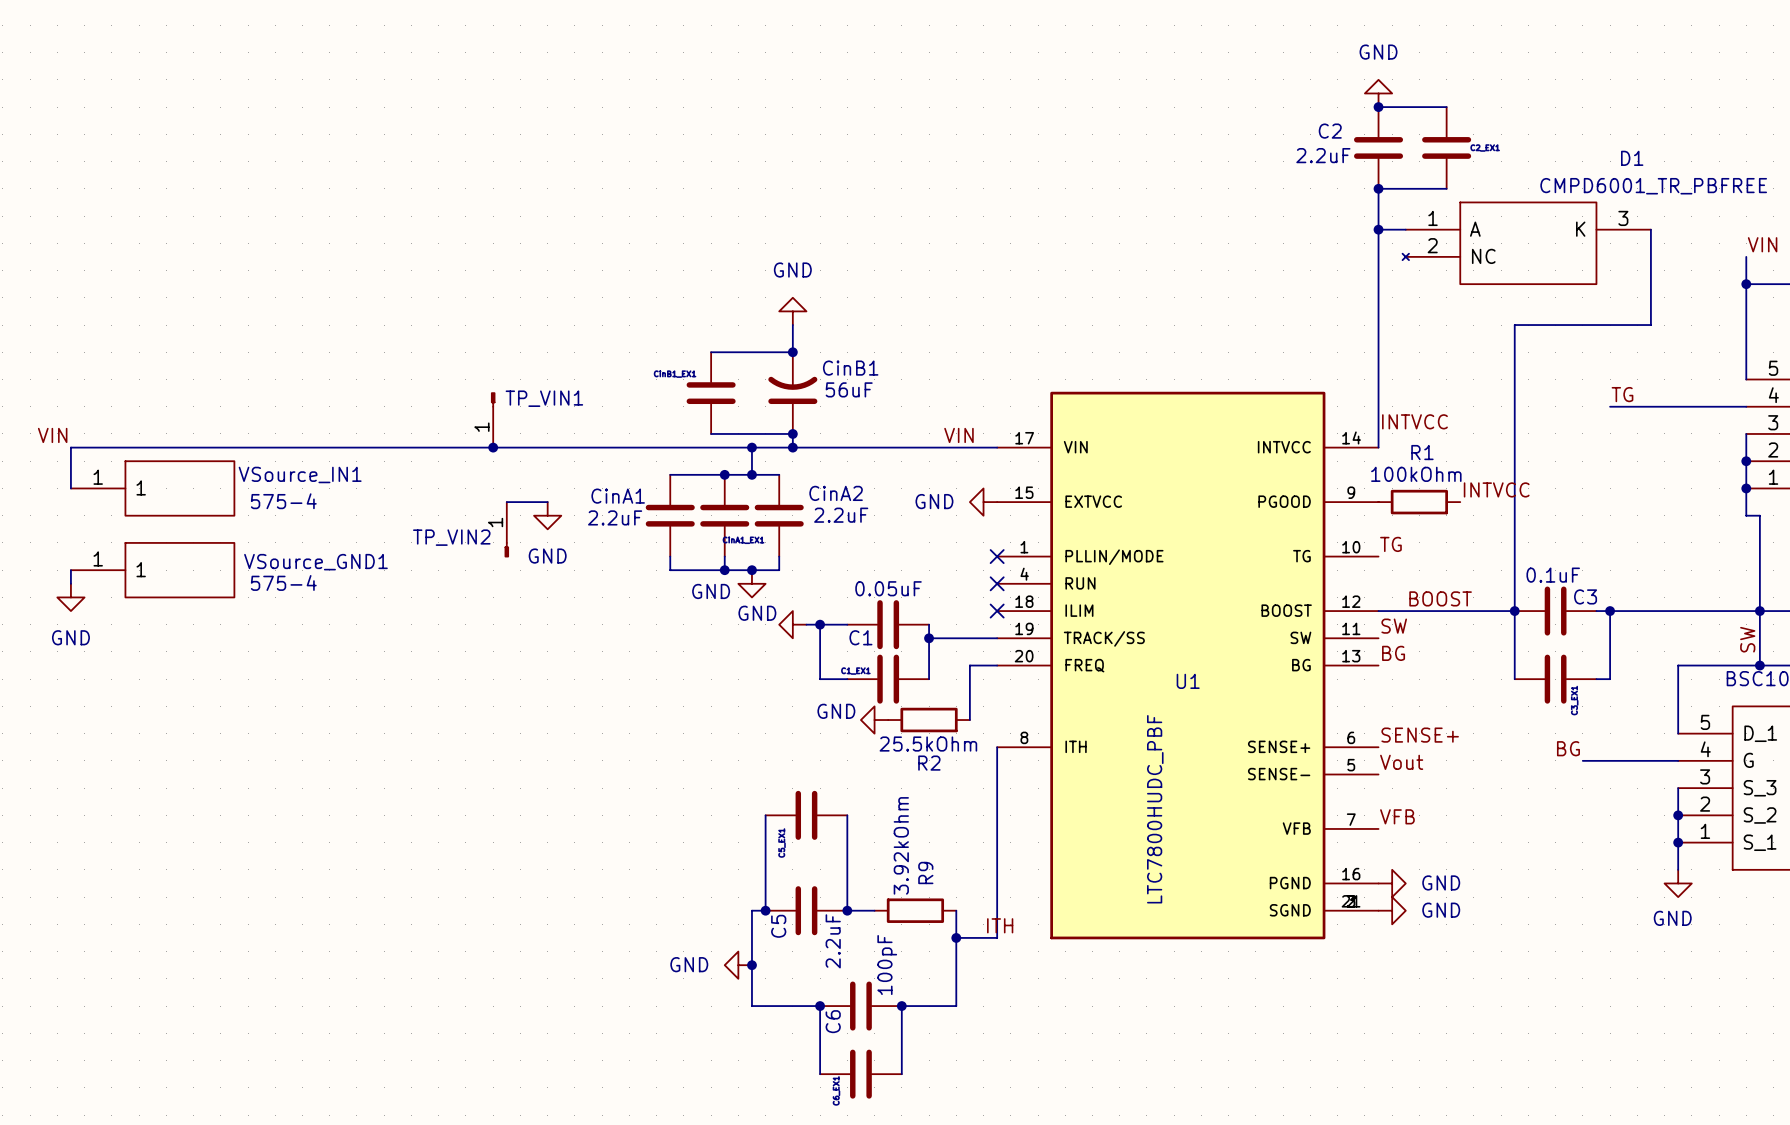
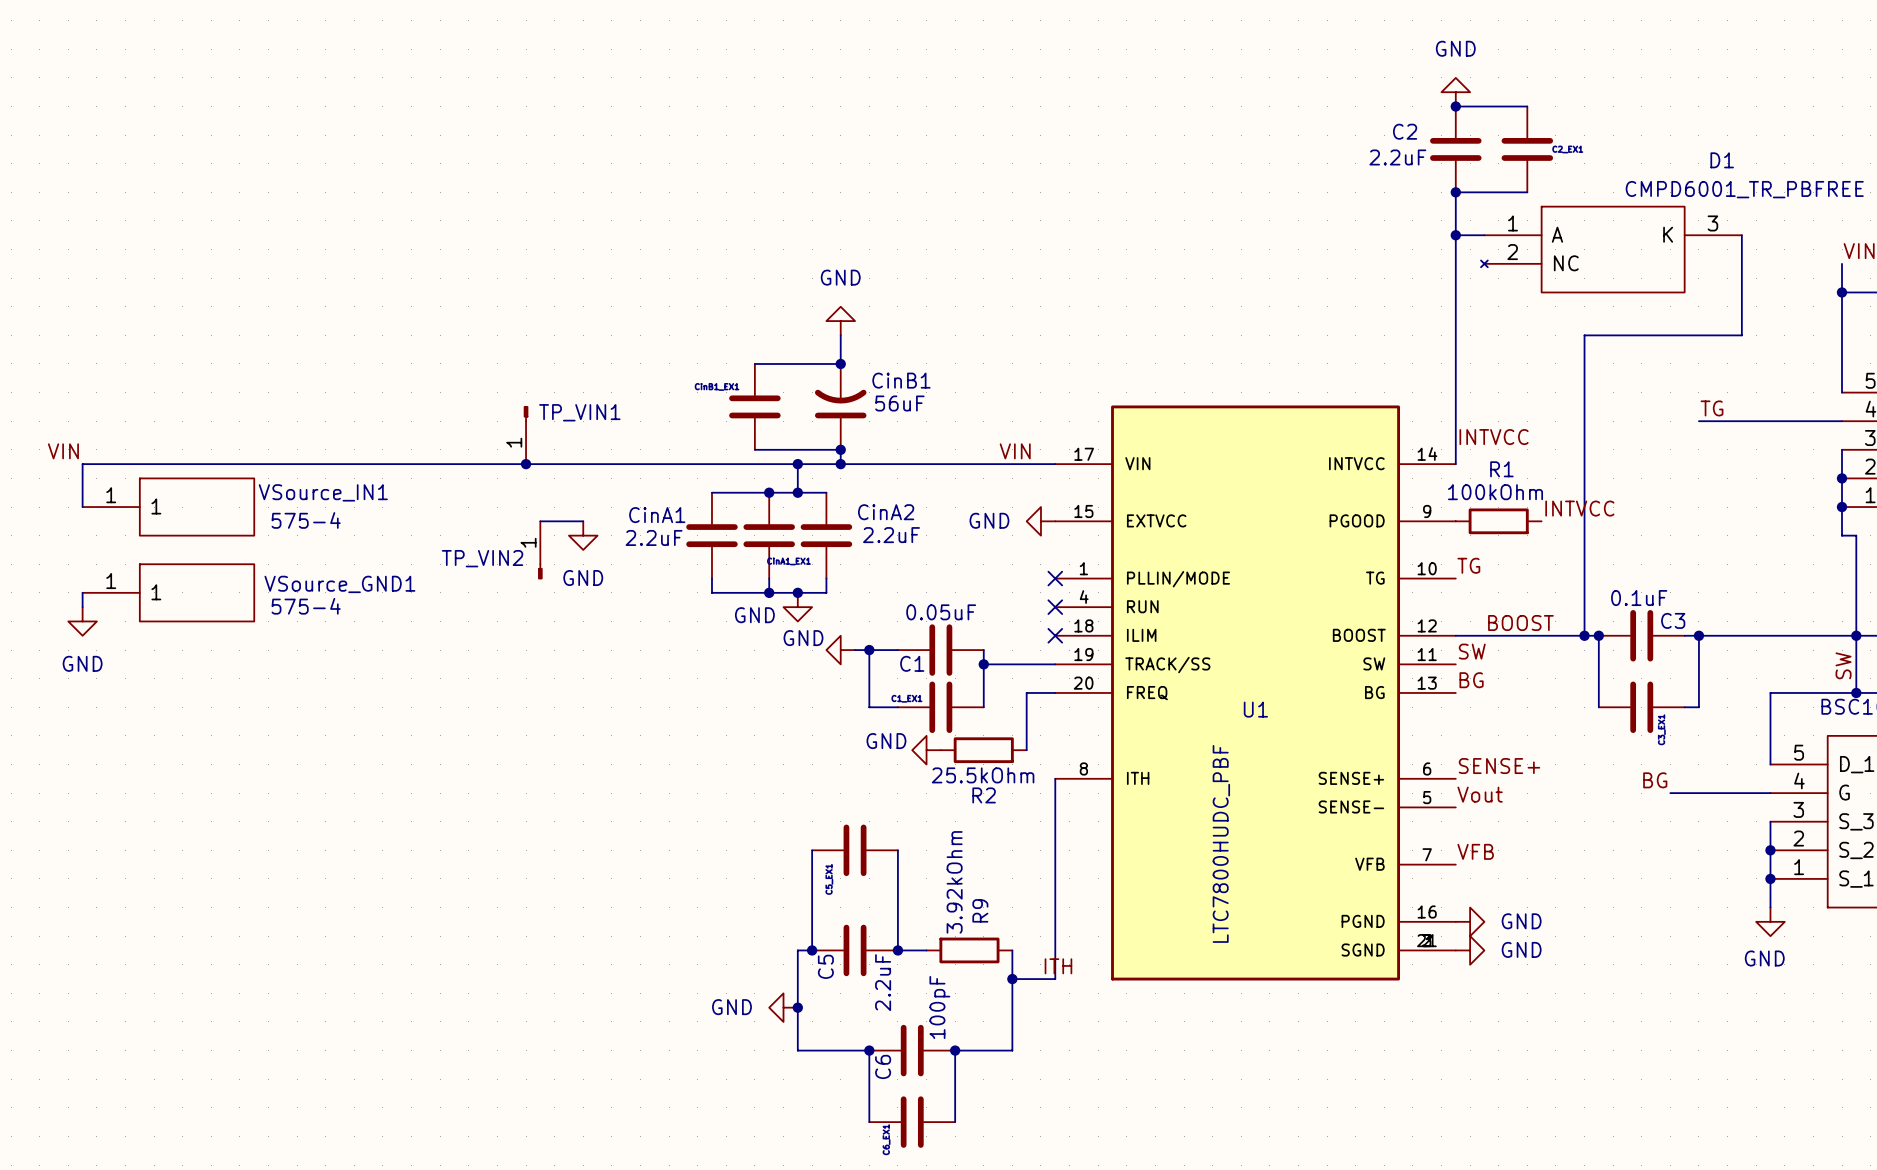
wire: (1514, 325) (1514, 611) -> (1598, 335) (1584, 335) (1584, 635)
junction: none -> (1584, 635)

